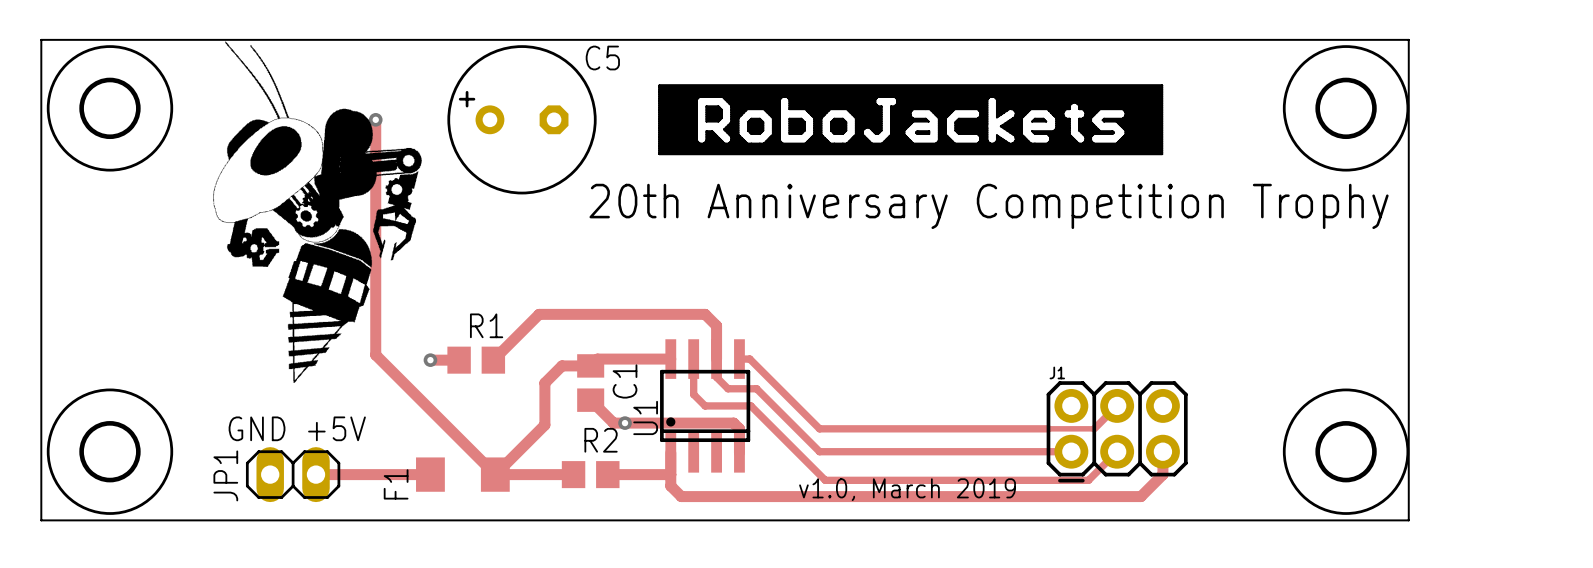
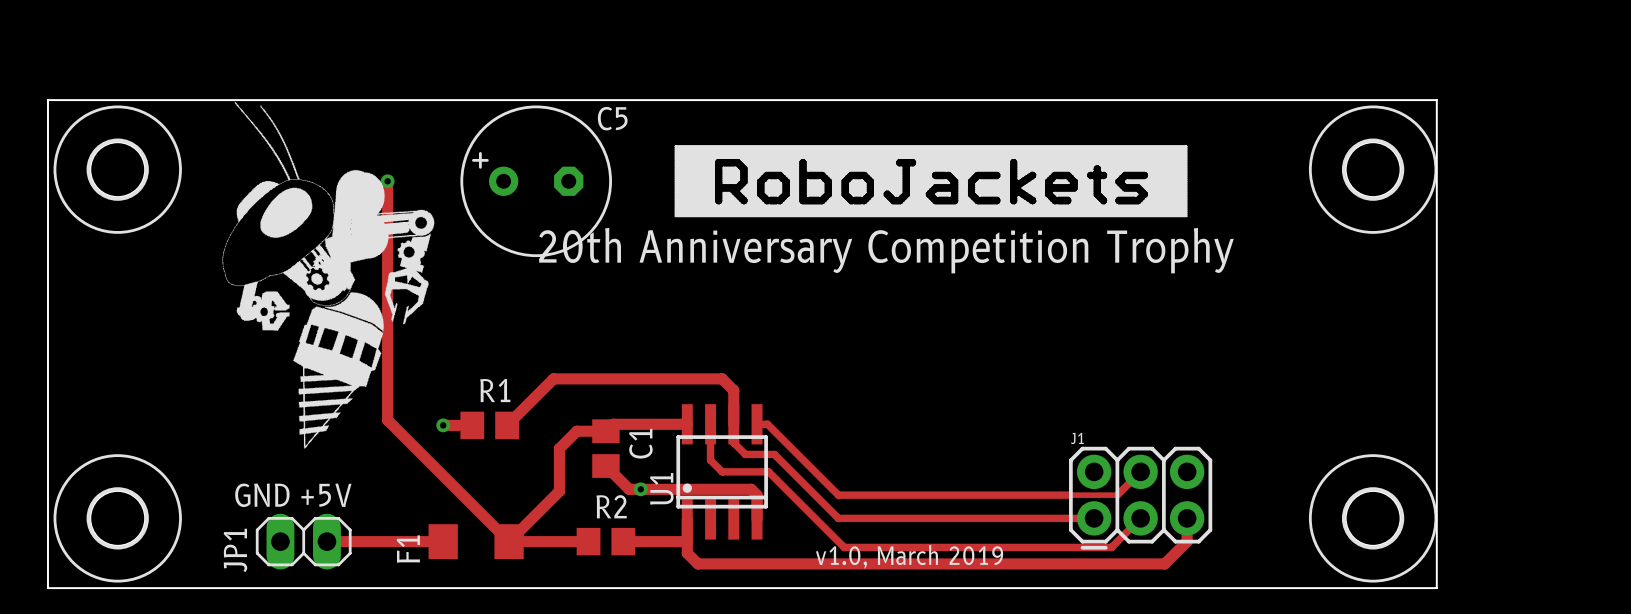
text position: 20th Anniversary Competition Trophy (989, 206) -> 20th Anniversary Competition Trophy (886, 250)

